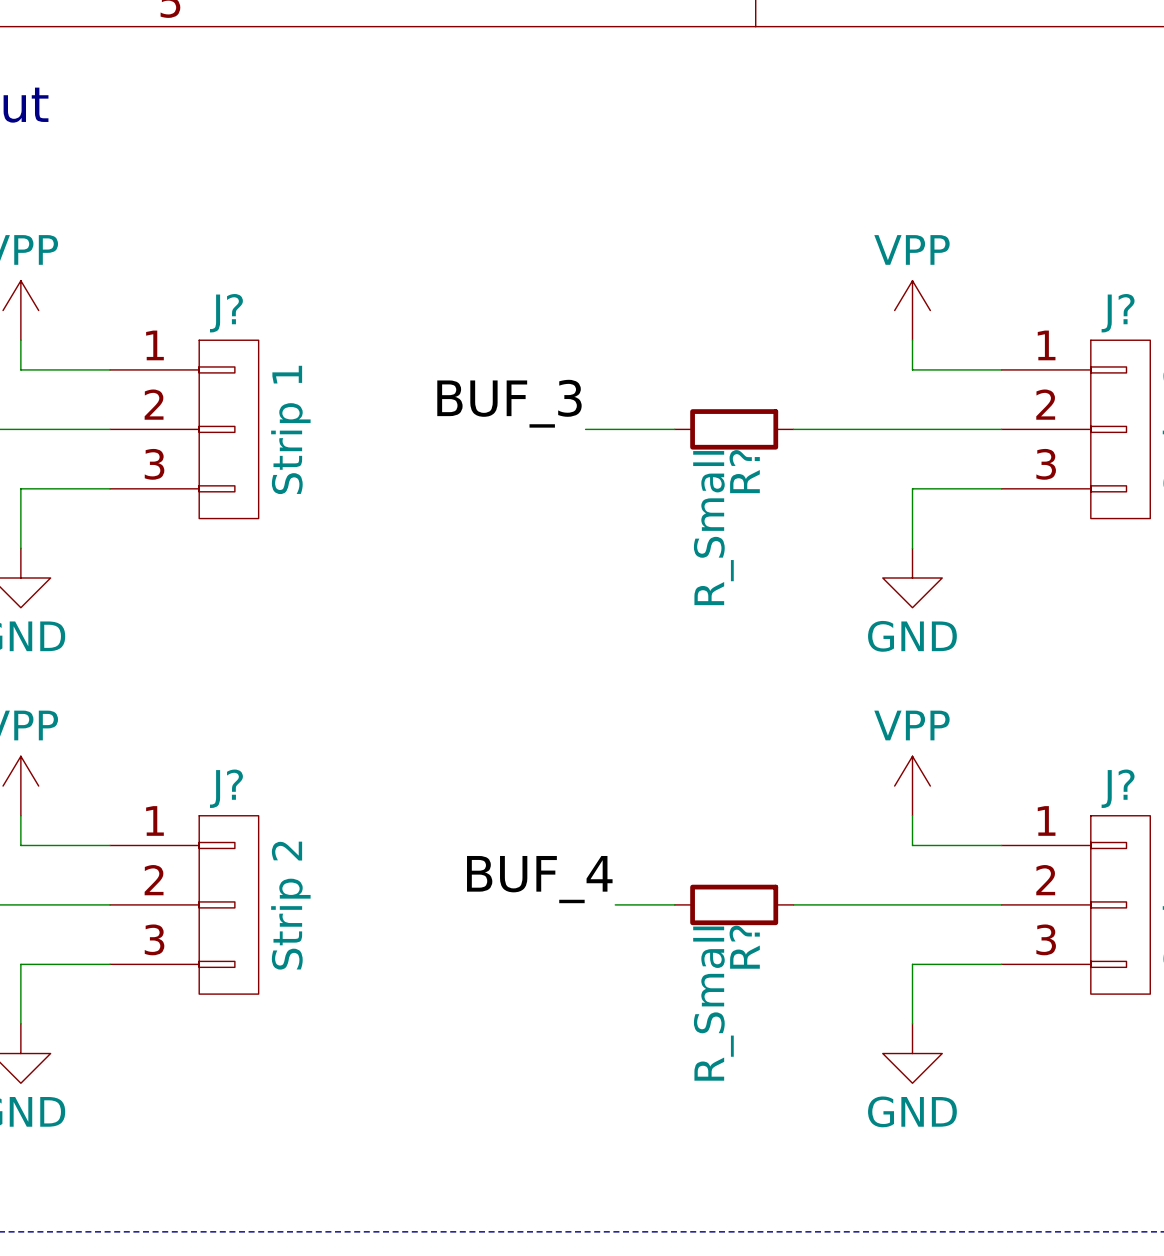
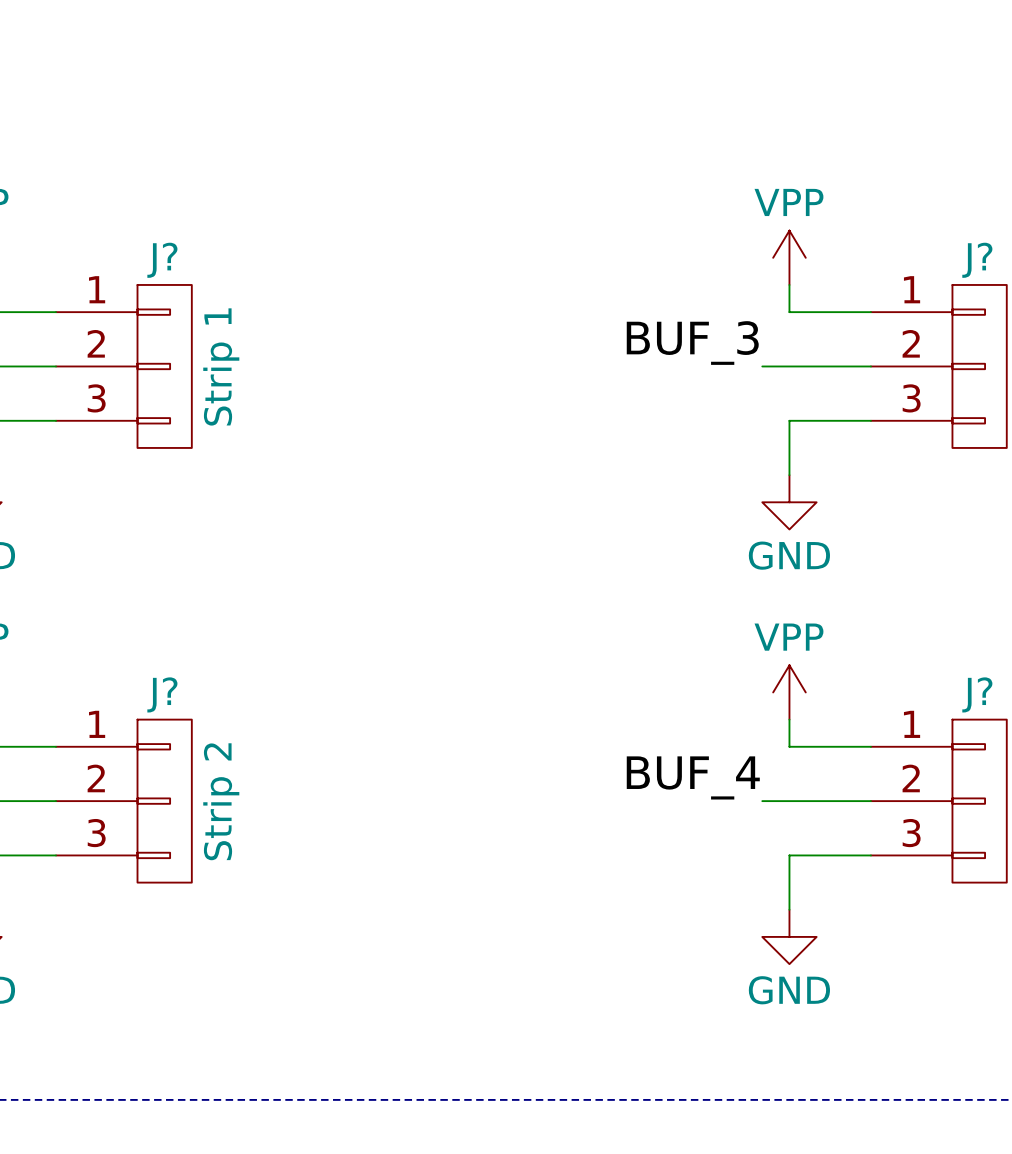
label position: BUF_3 (509, 403) -> BUF_3 (692, 343)
wire: (585, 429) (674, 429) -> none
R?: R_Small (734, 429) -> none
wire: (793, 429) (882, 429) -> none
label position: BUF_4 (539, 879) -> BUF_4 (693, 777)
wire: (615, 904) (674, 904) -> none
R?: R_Small (734, 904) -> none
wire: (793, 904) (882, 904) -> none

